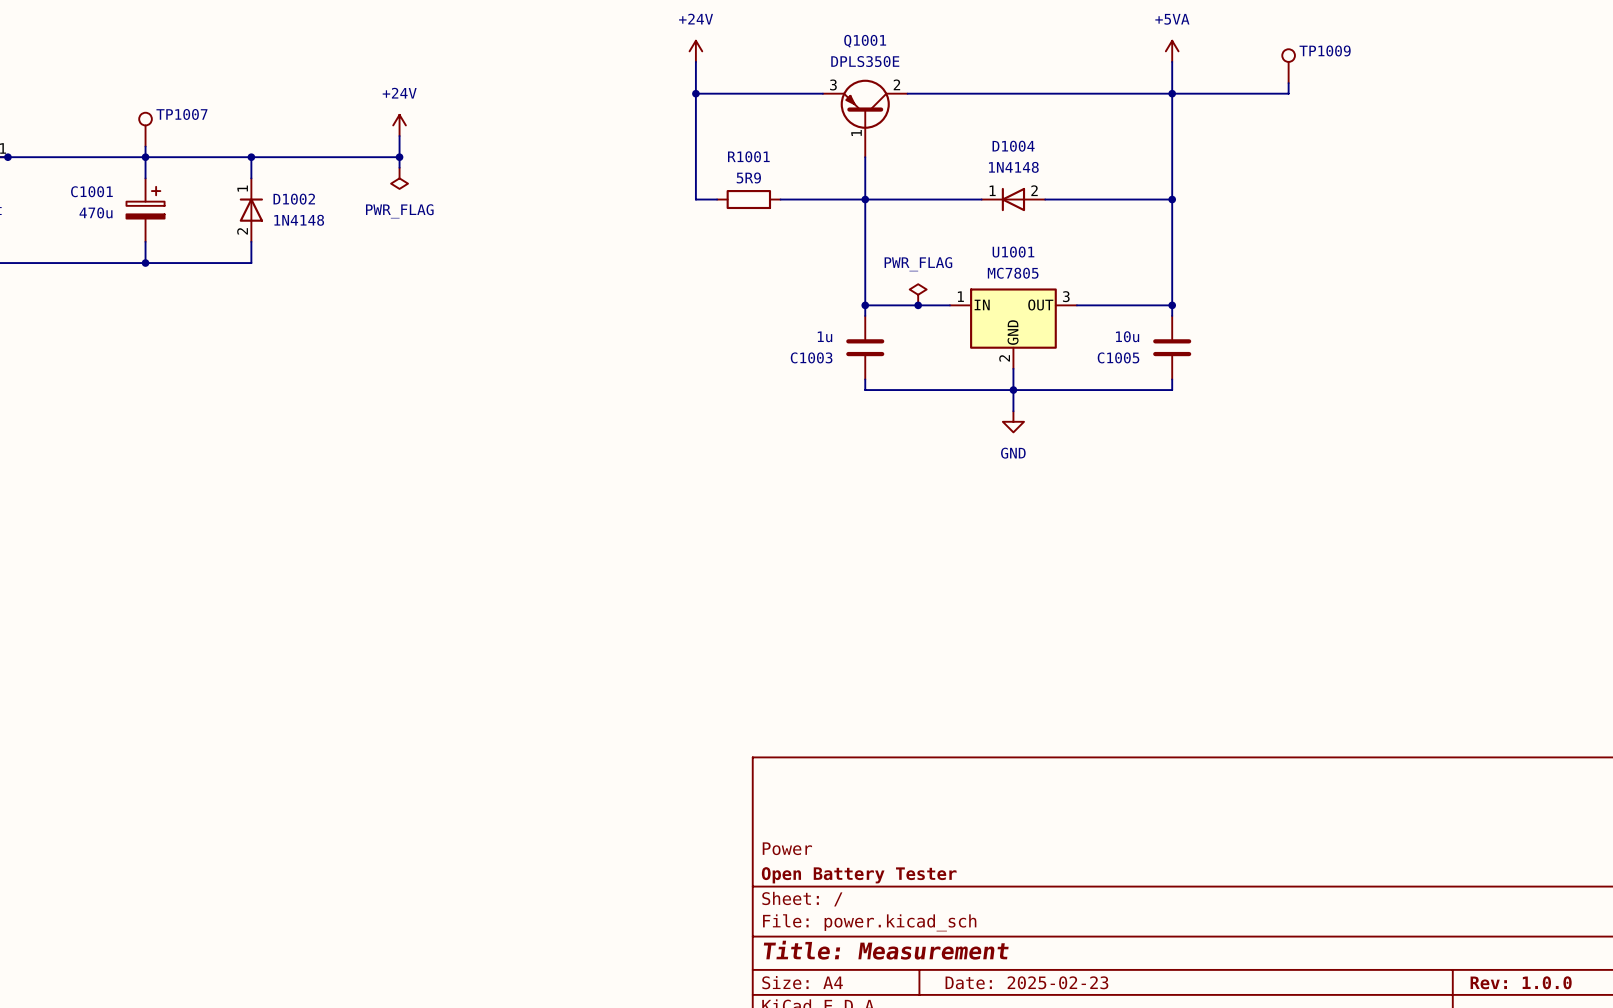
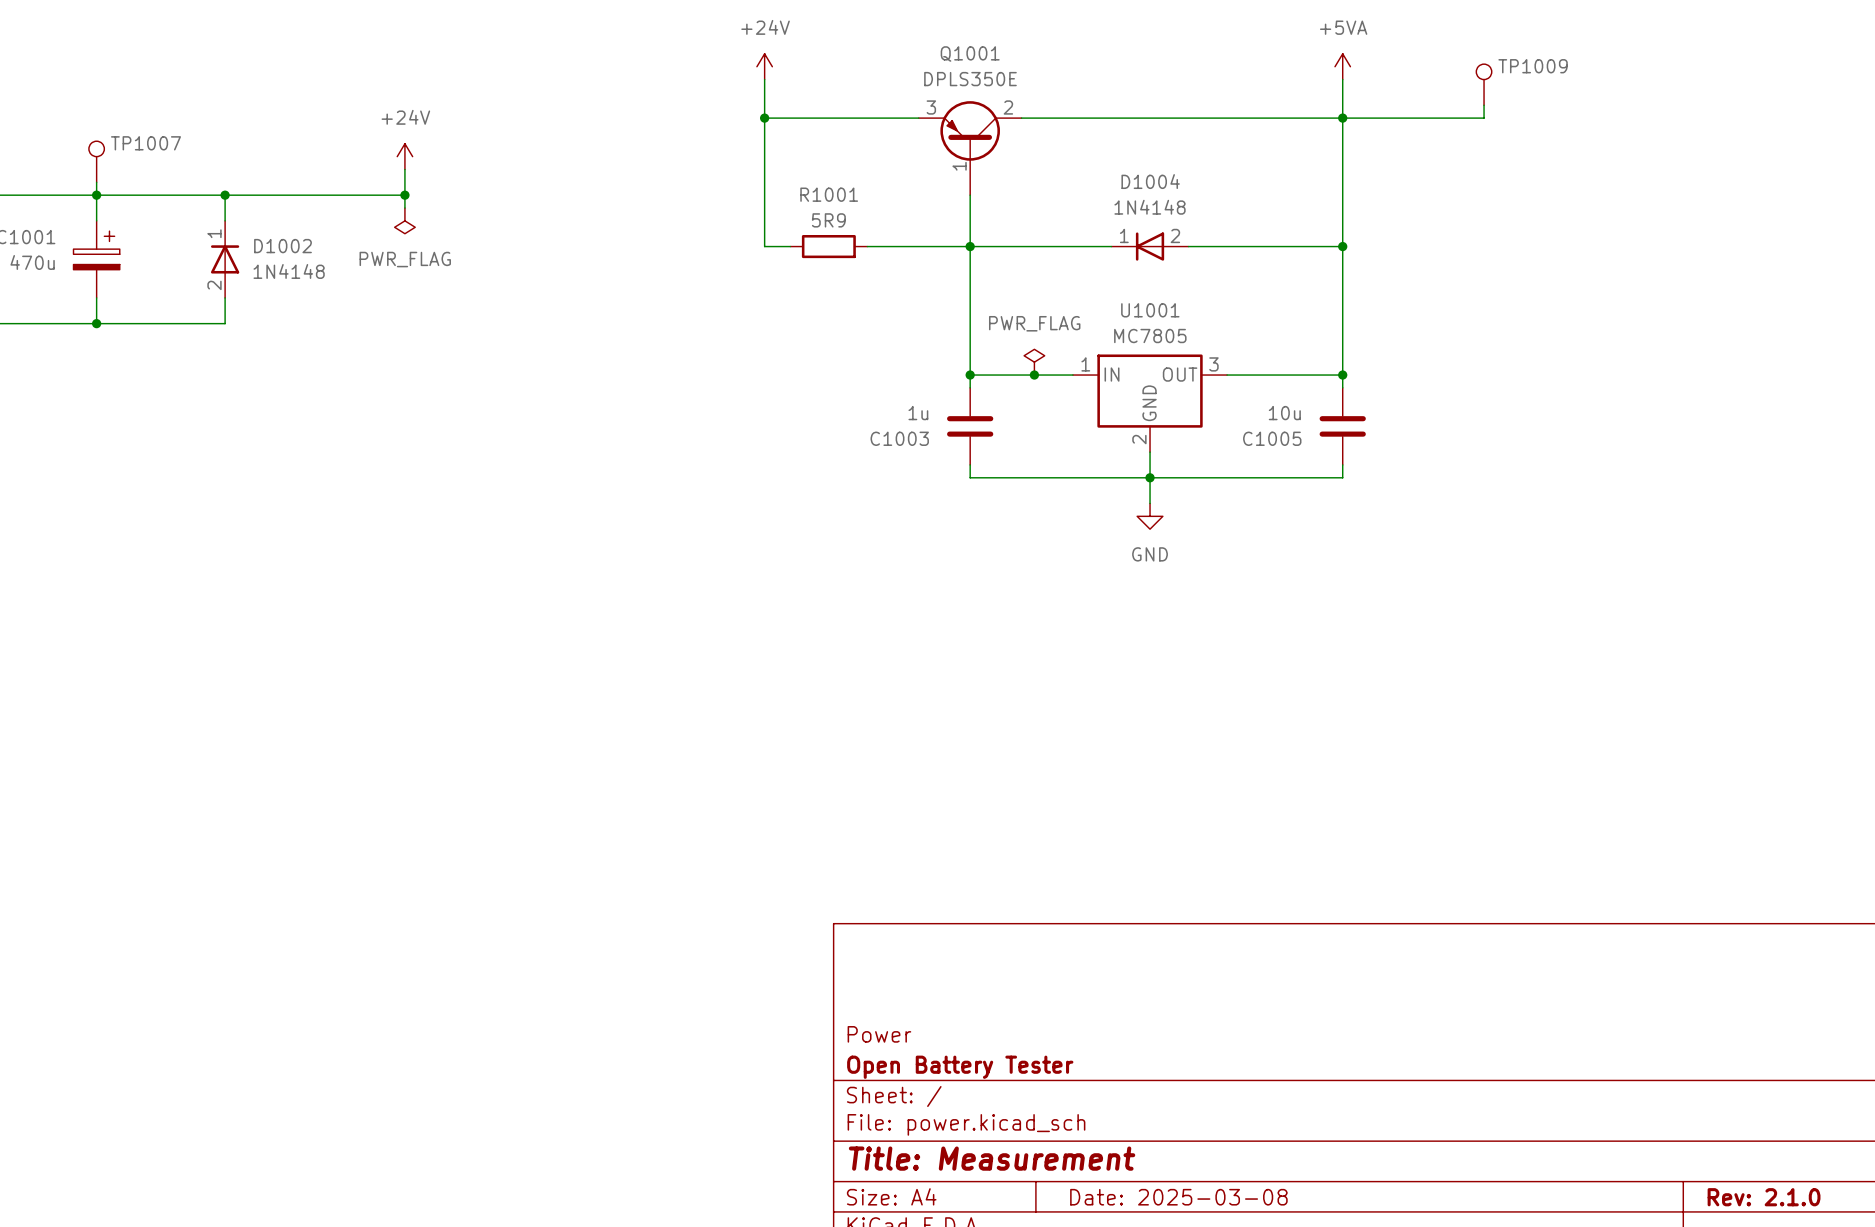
title block: Date: 2025-02-23 (1026, 982) -> Date: 2025-03-08 (1178, 1197)
title block: Rev: 1.0.0 (1521, 982) -> Rev: 2.1.0 (1764, 1197)

